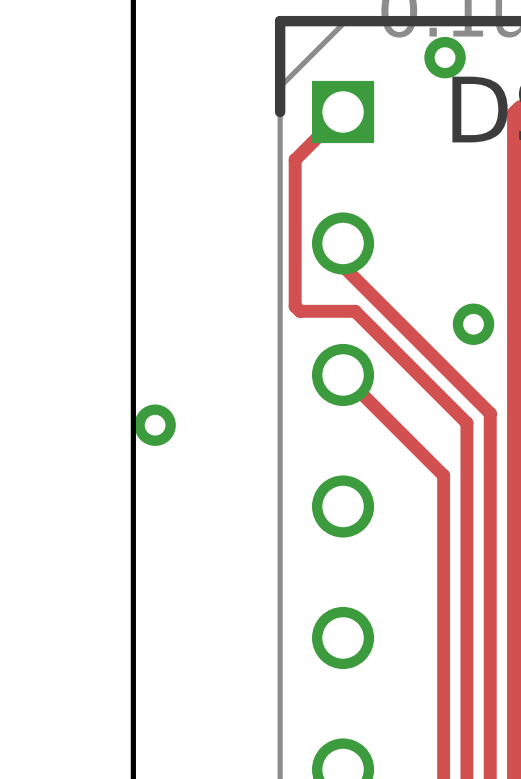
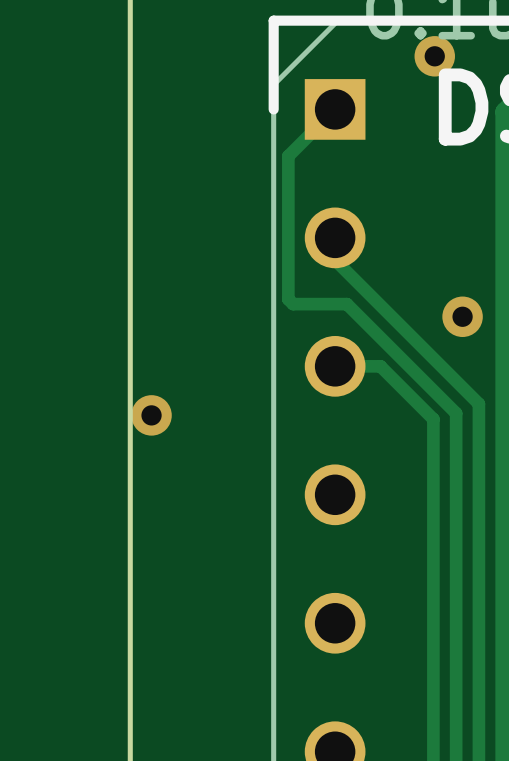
track: (343, 374) (443, 475) -> (335, 366) (380, 366) (433, 419) (433, 464)

